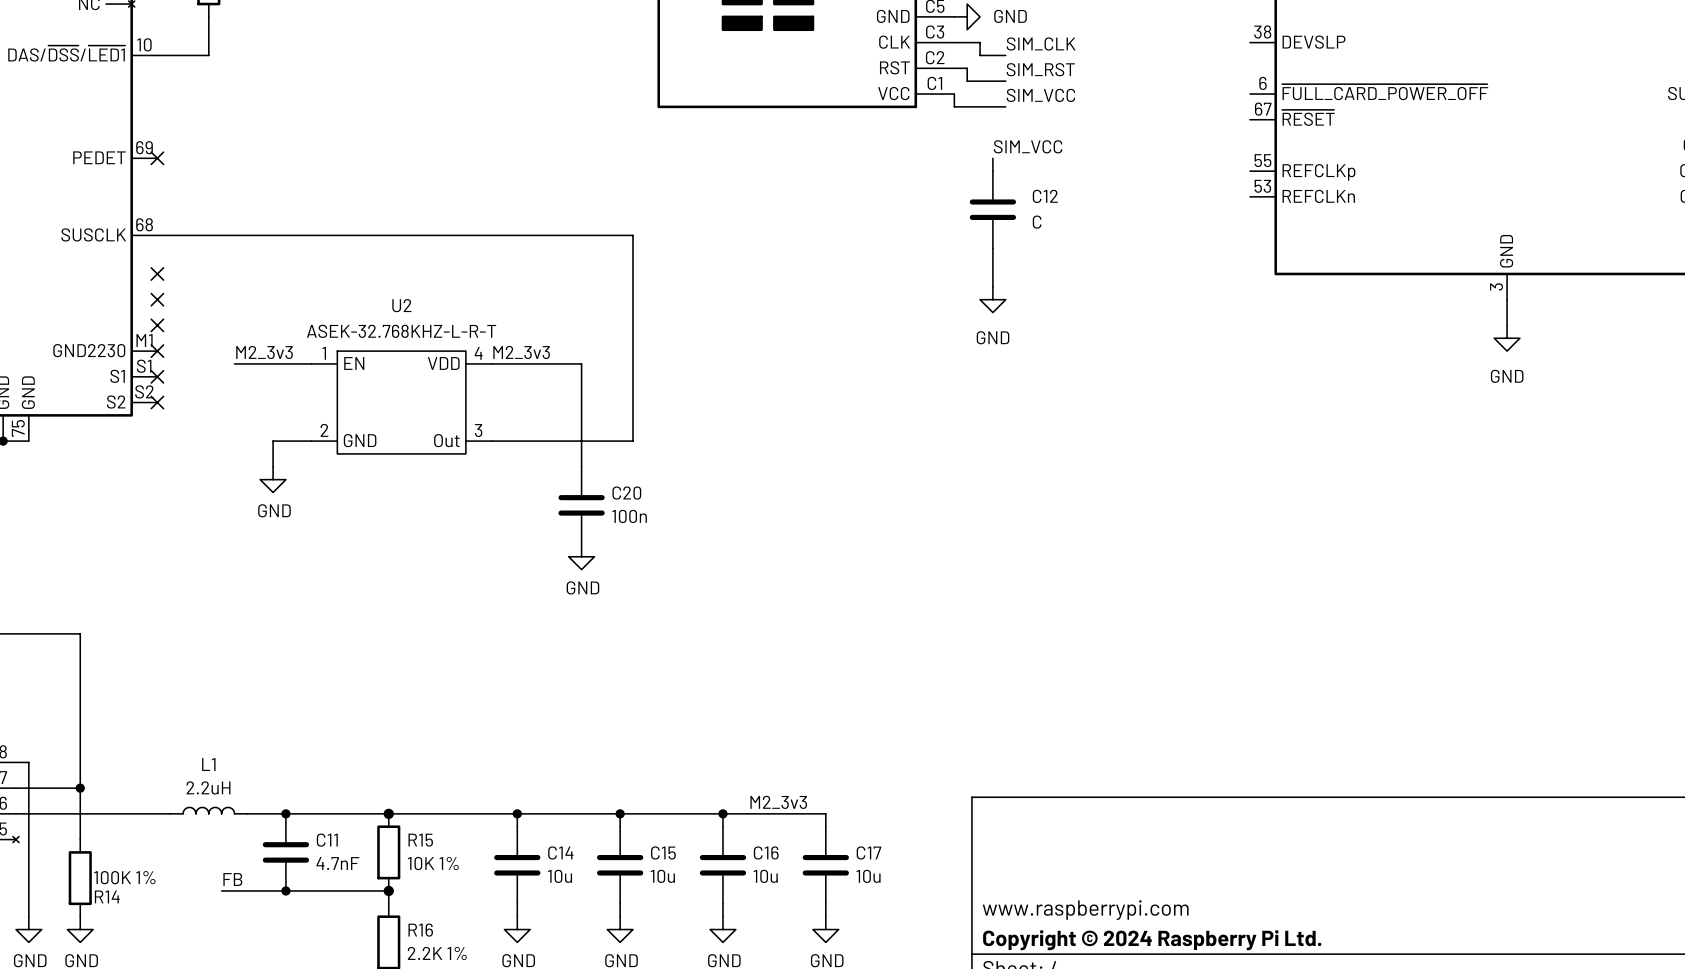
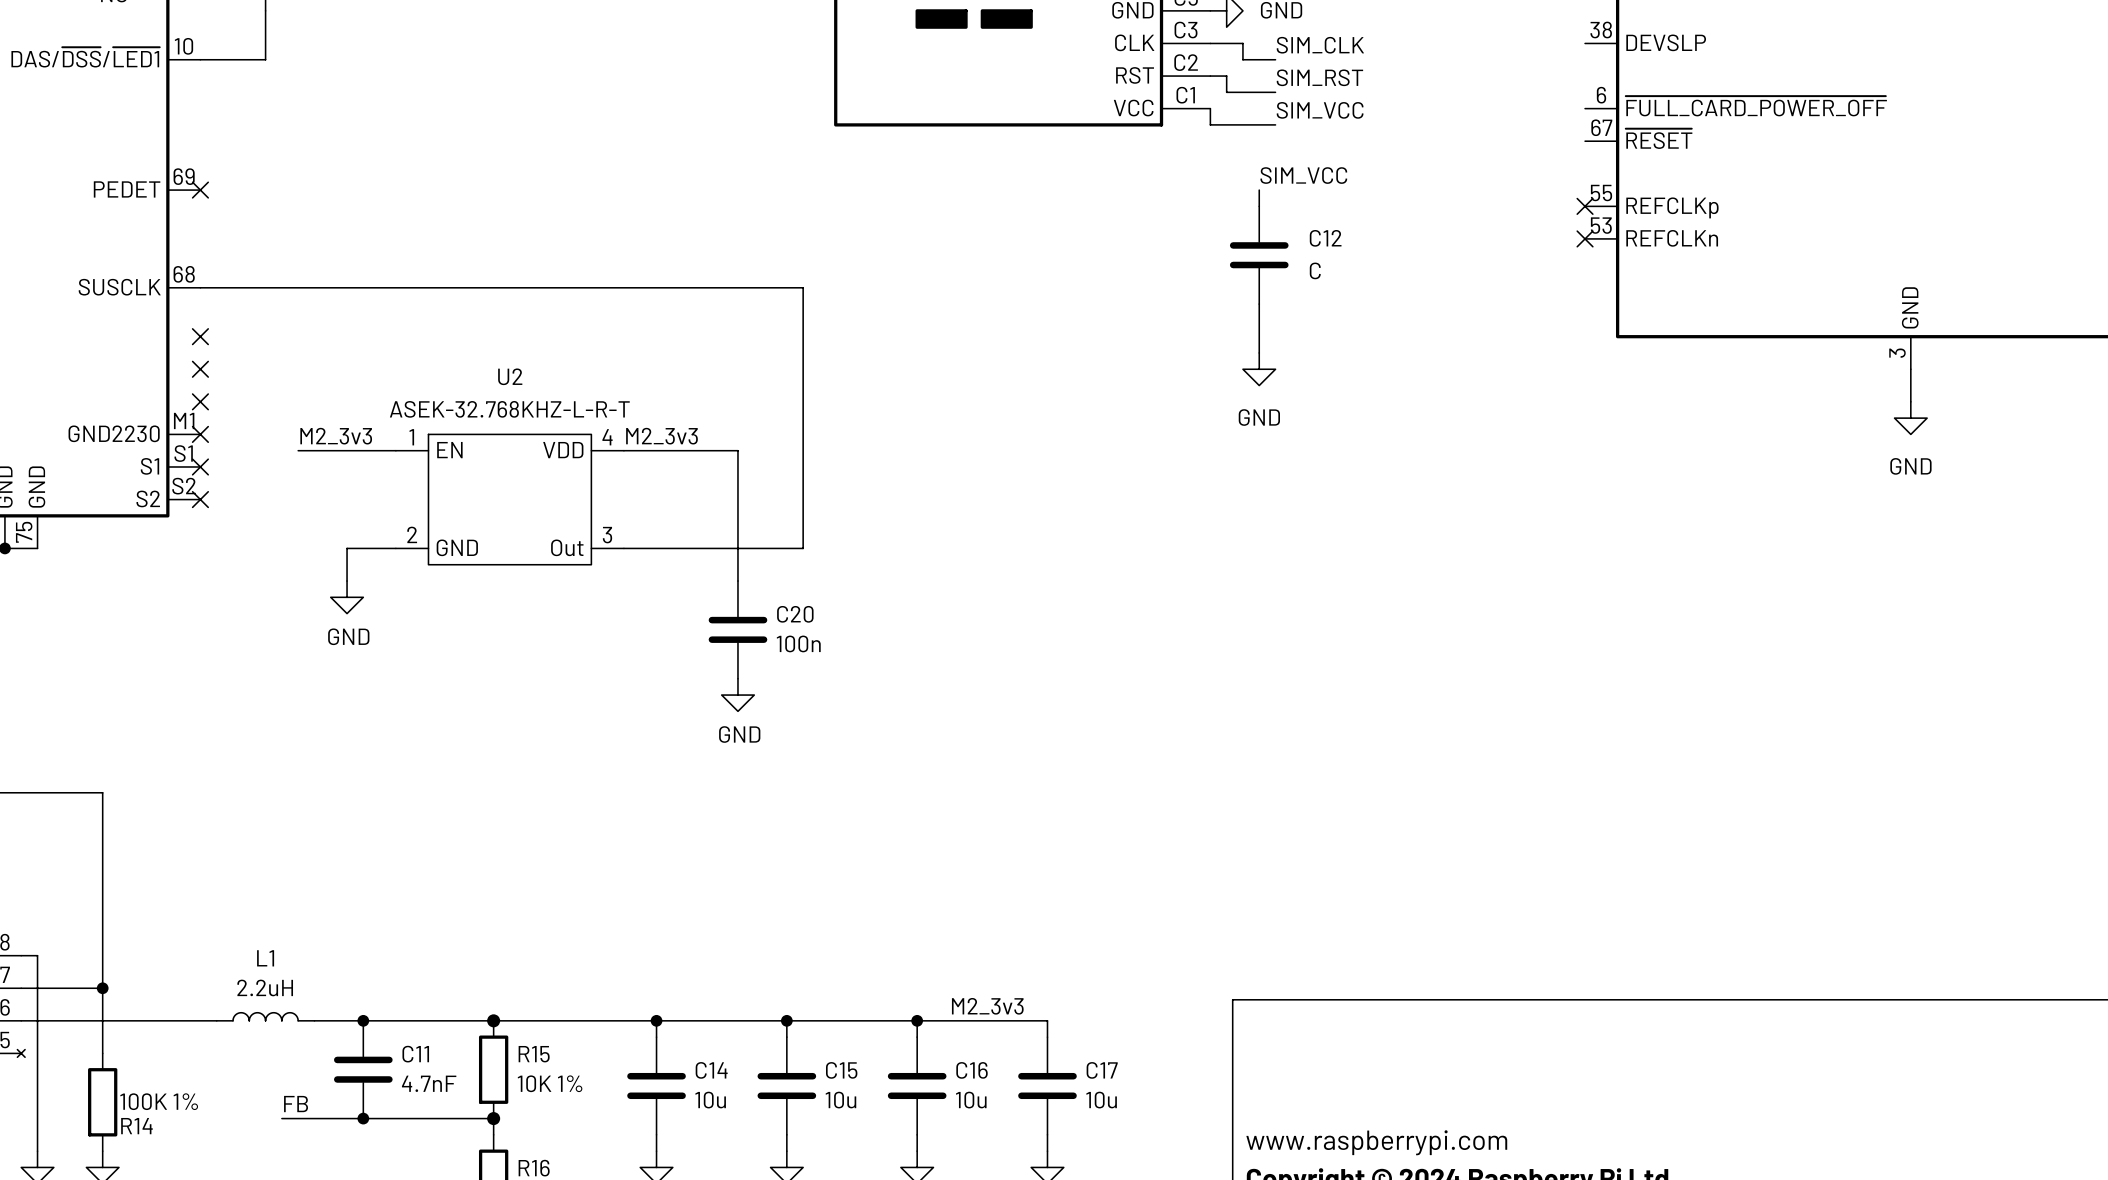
no-connect mark: none -> (1585, 206)
no-connect mark: none -> (1585, 238)

